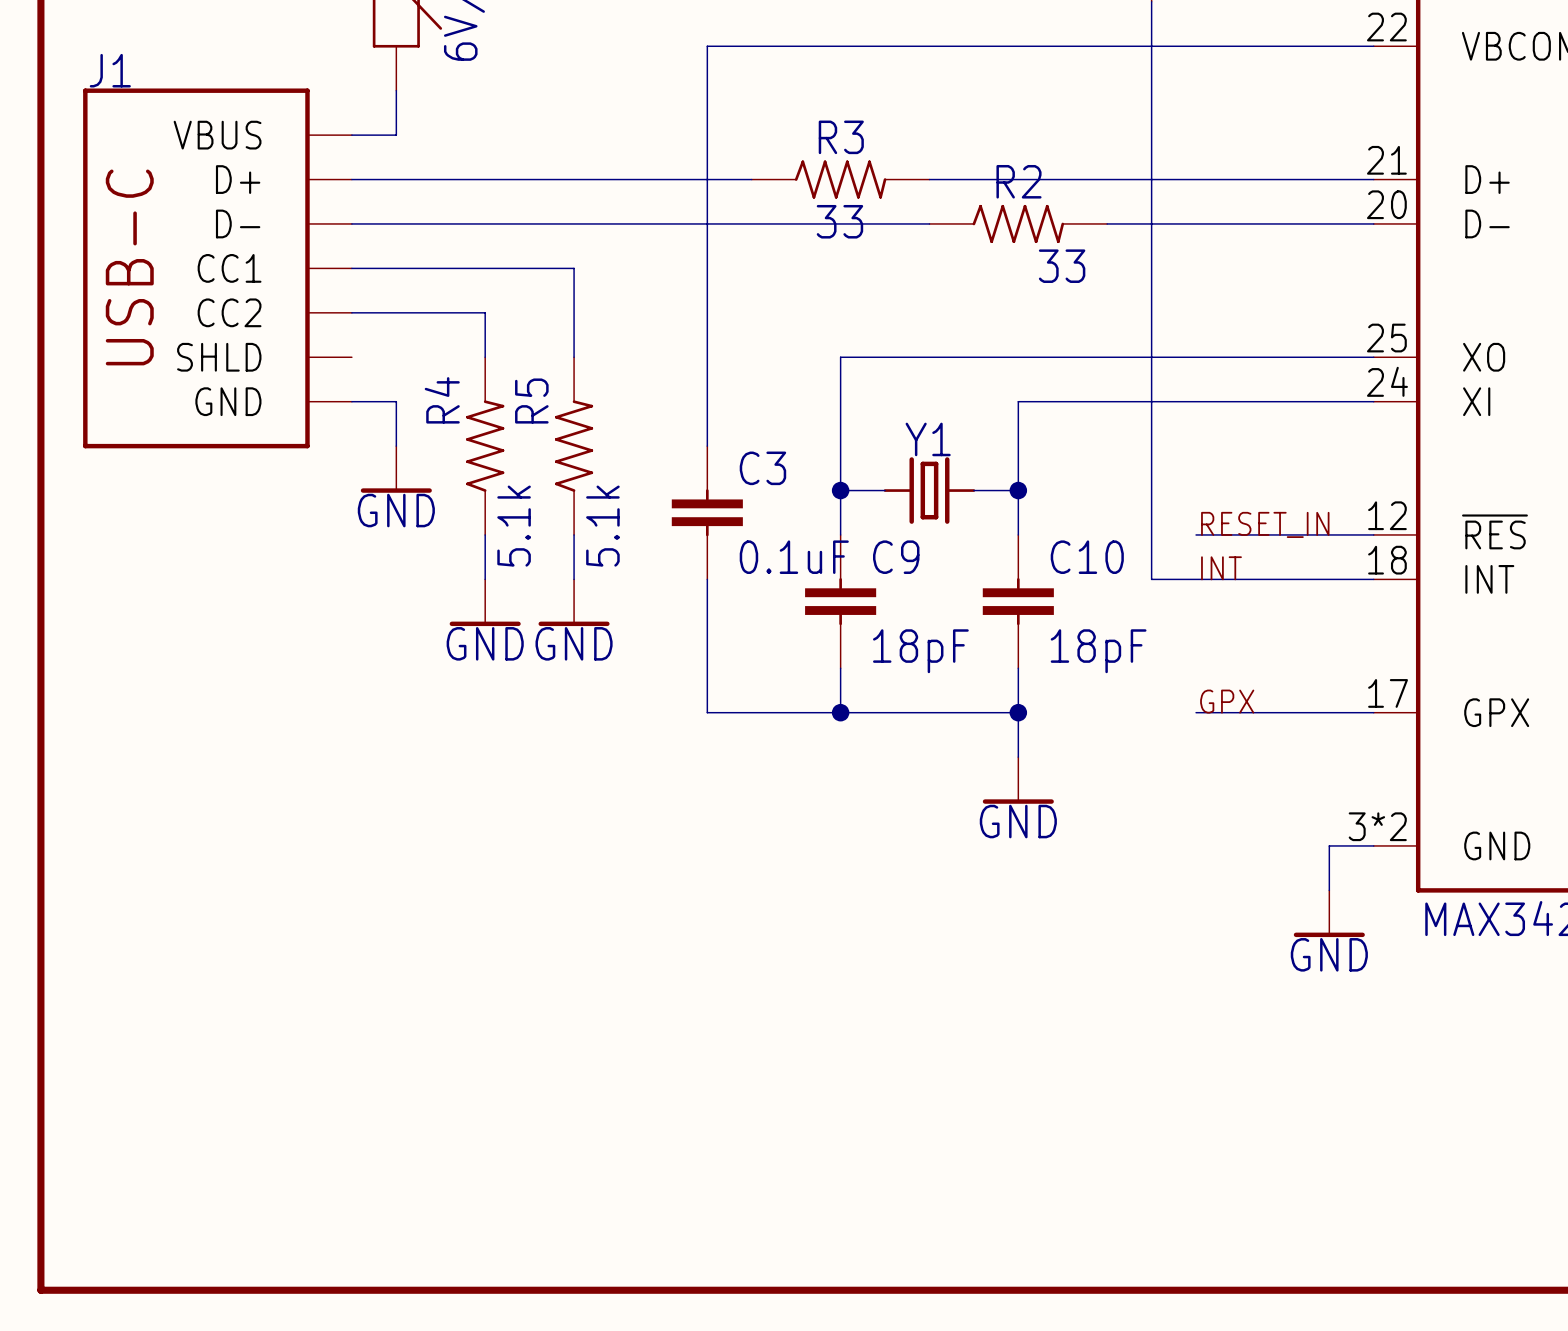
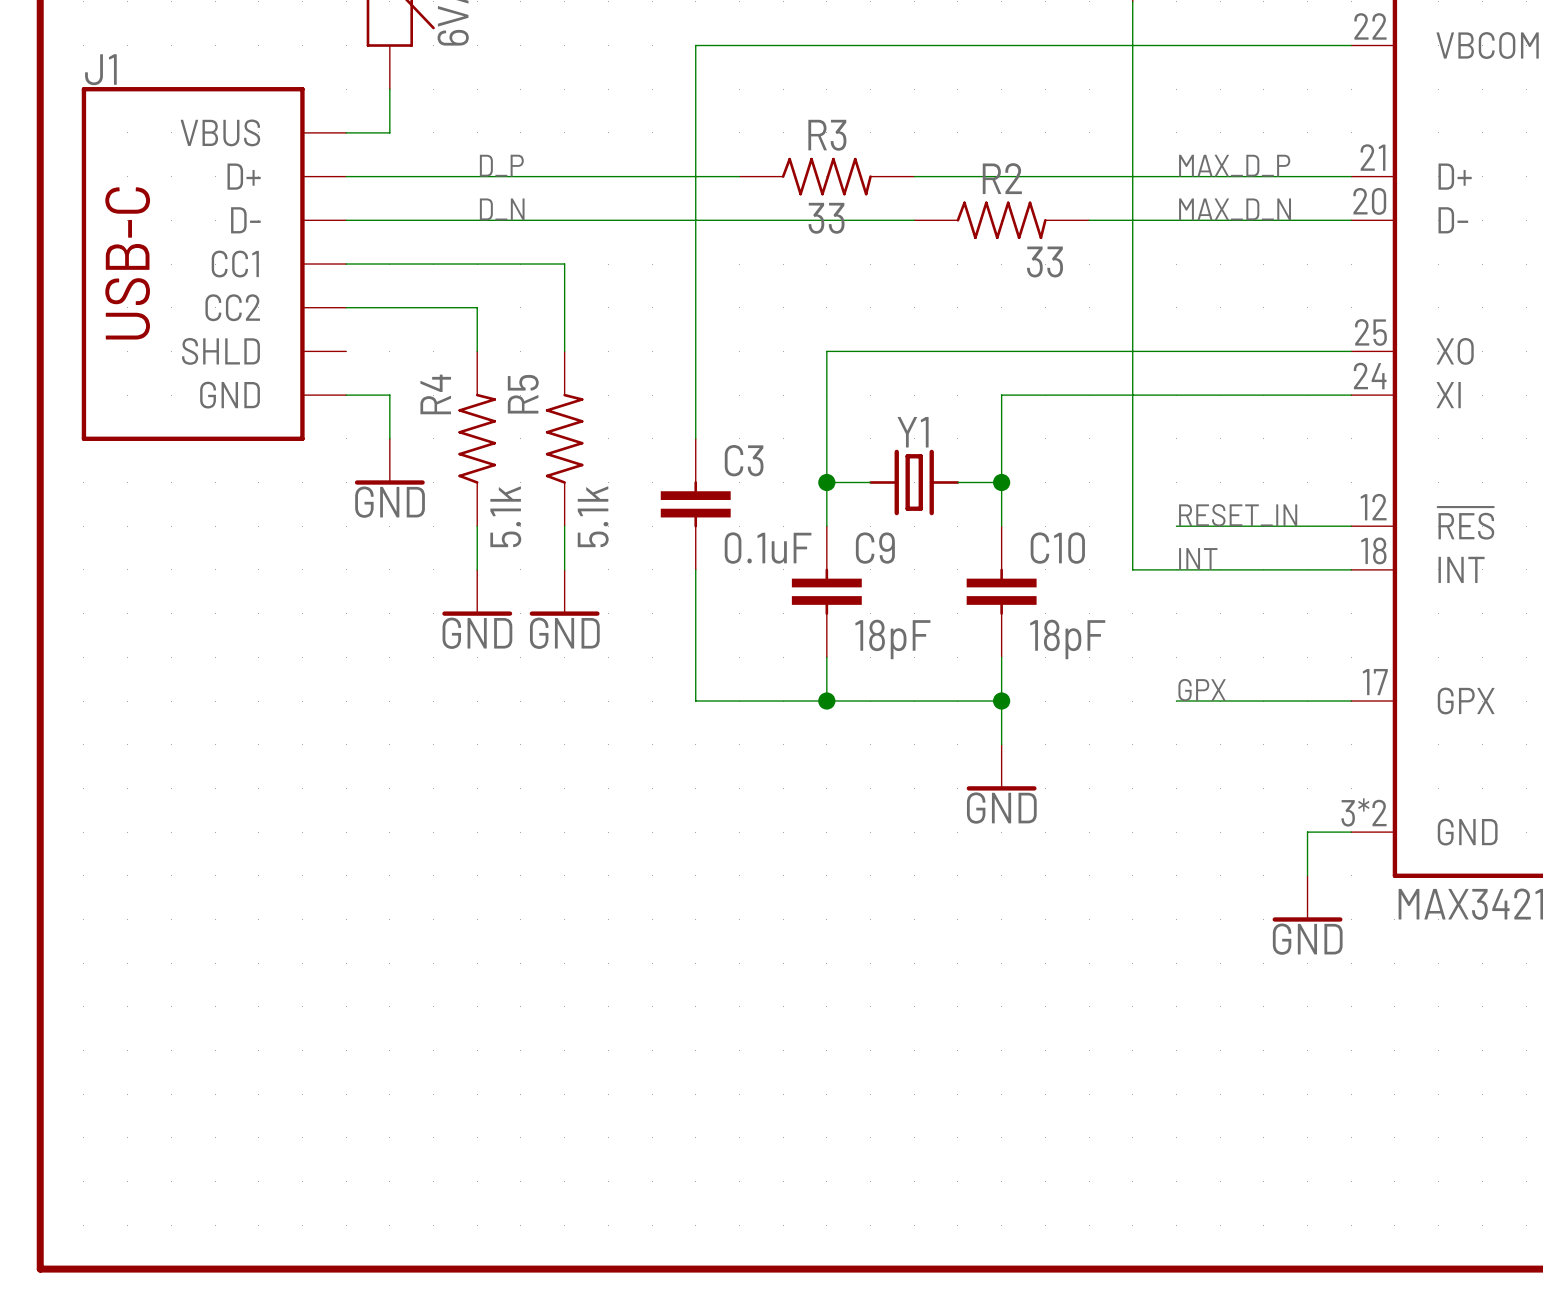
label: none -> D_P (501, 165)
label: none -> MAX_D_P (1234, 165)
label: none -> D_N (502, 209)
label: none -> MAX_D_N (1235, 209)

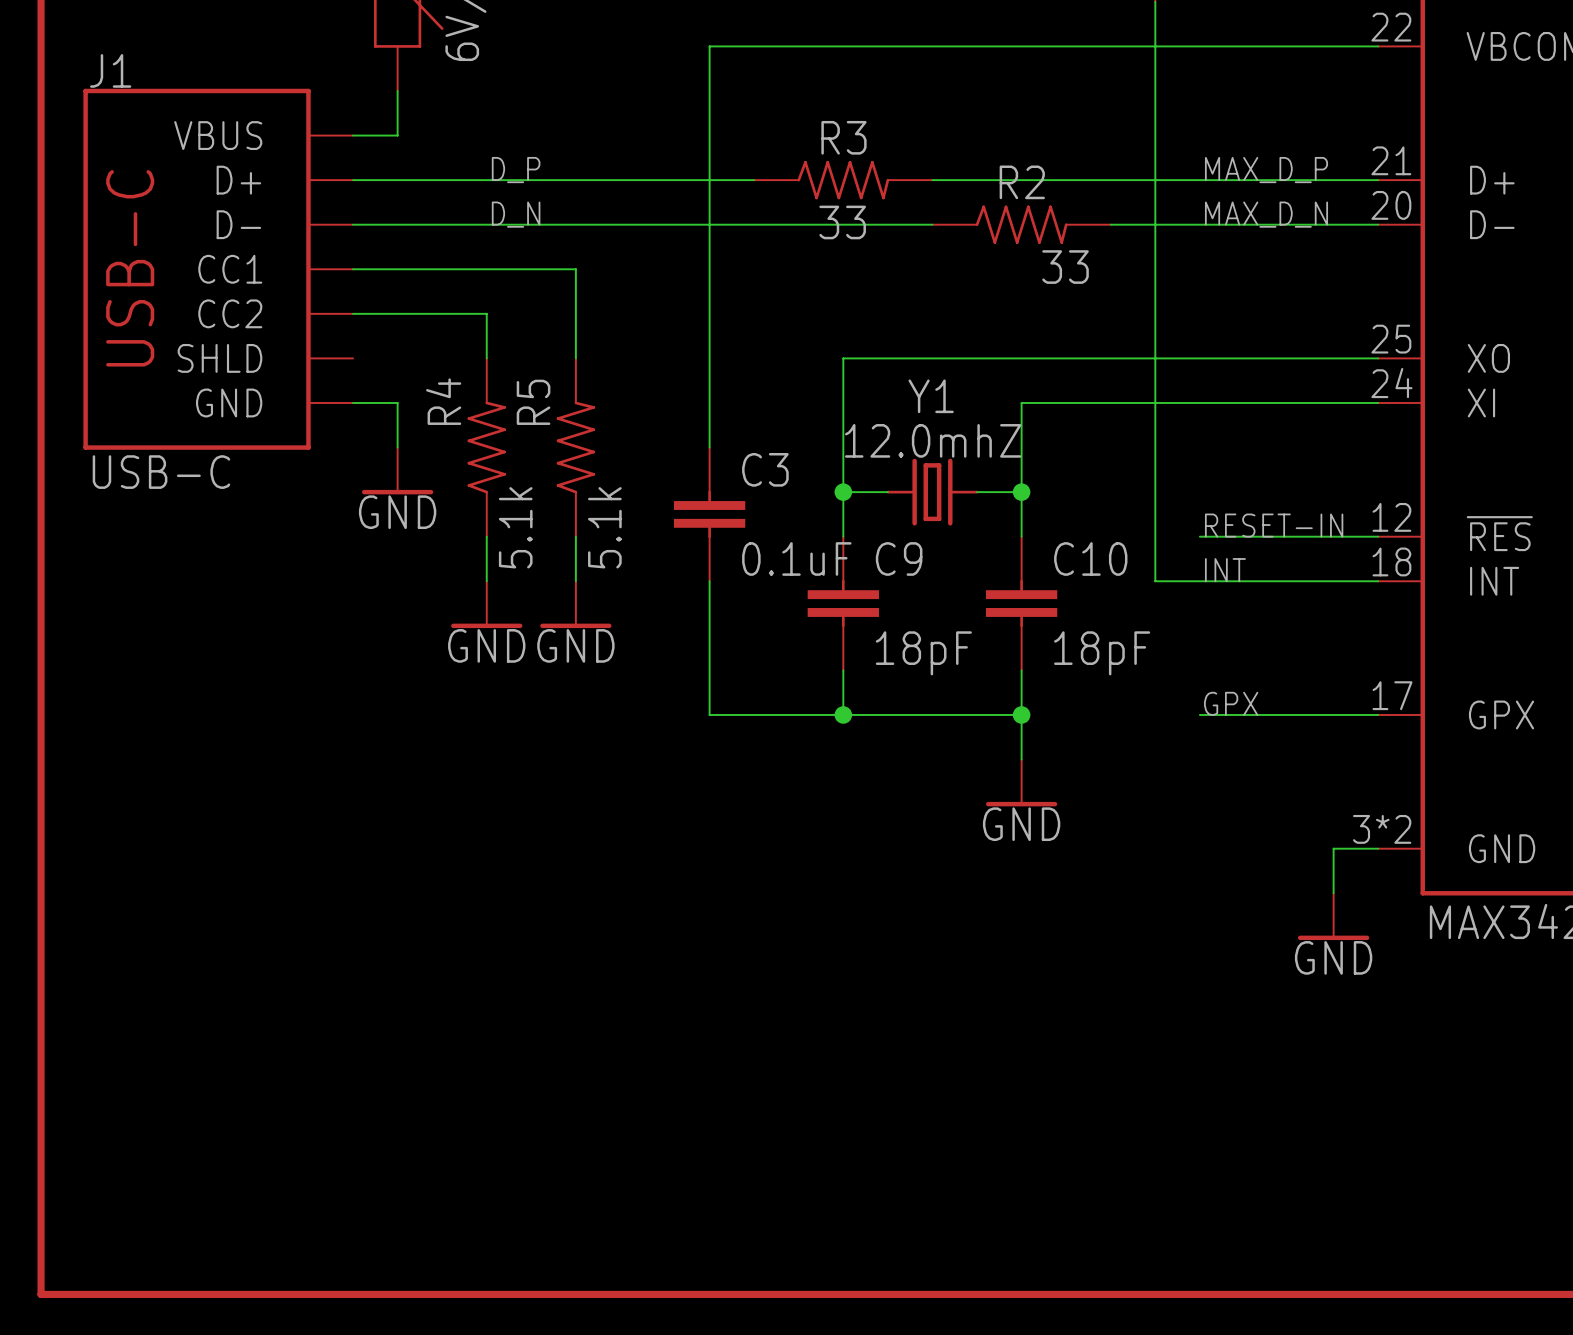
Y1 name position: Y1 (913, 432) -> Y1 (931, 396)
Y1 value: none -> 12.0mhZ (933, 440)
J1 value: none -> USB-C (161, 472)
label: RESET_IN (1238, 515) -> RESET-IN (1274, 525)

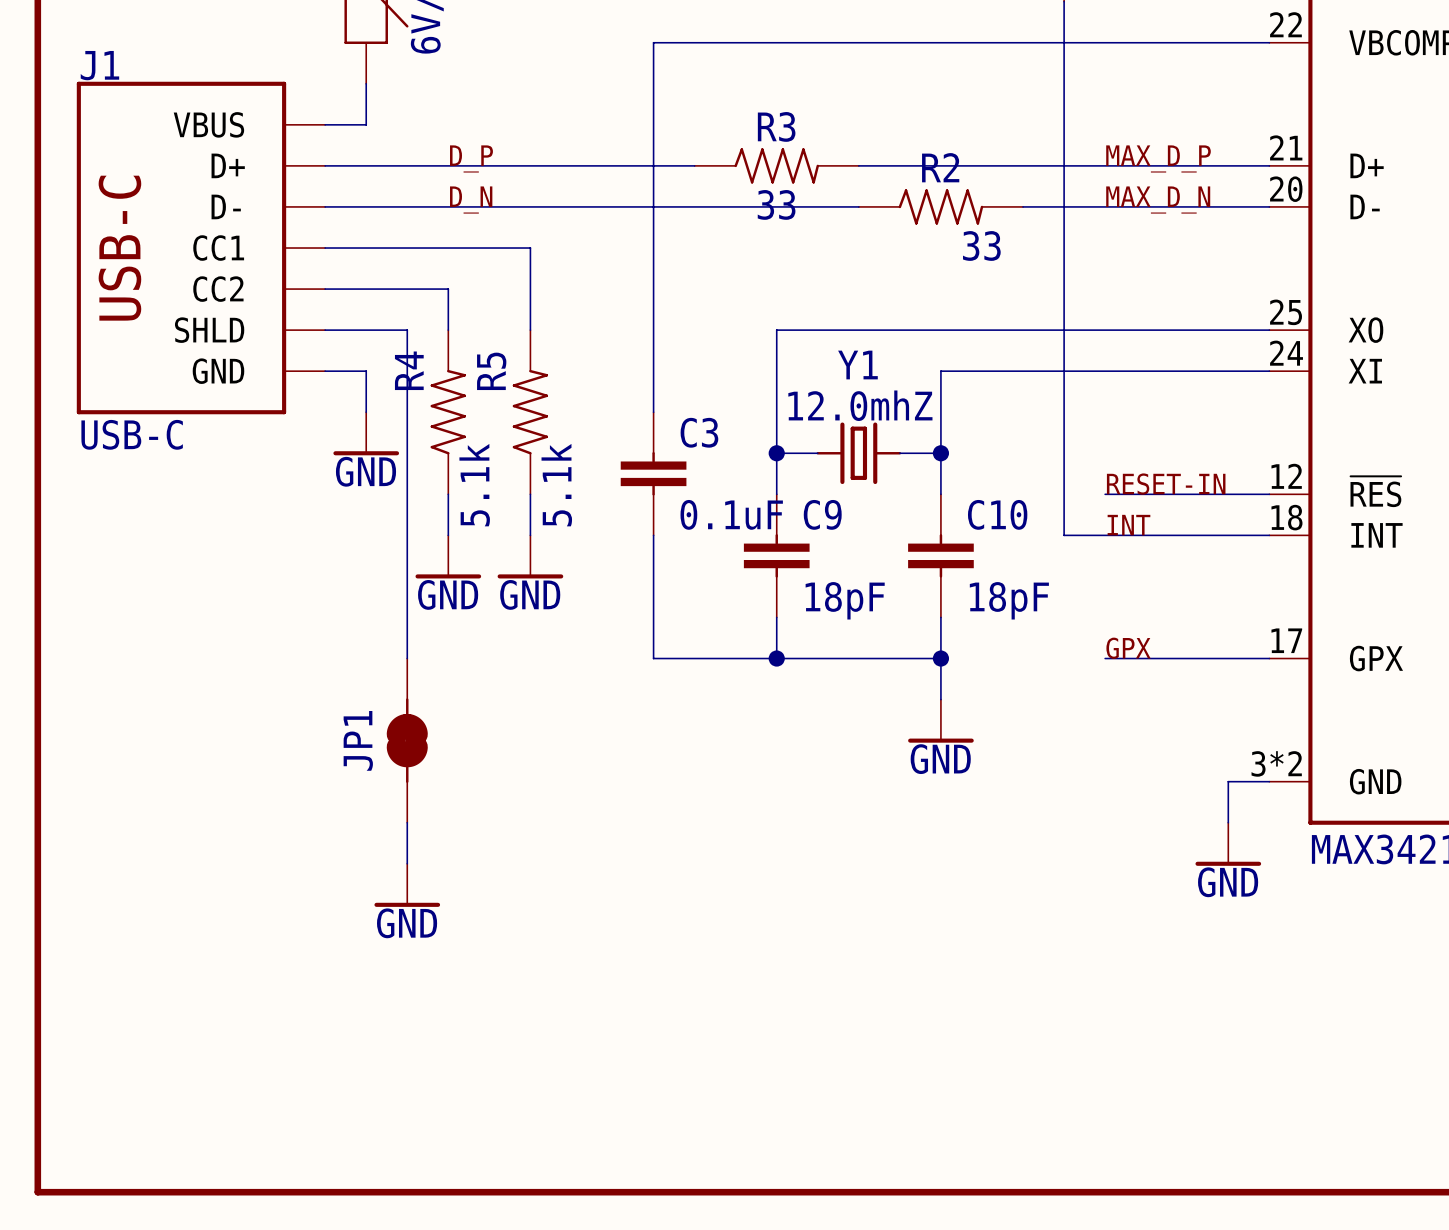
wire: none -> (325, 330) (407, 330) (407, 658)
JP1: none -> (407, 740)
wire: none -> (407, 822) (407, 863)
power symbol: none -> GND (407, 885)

